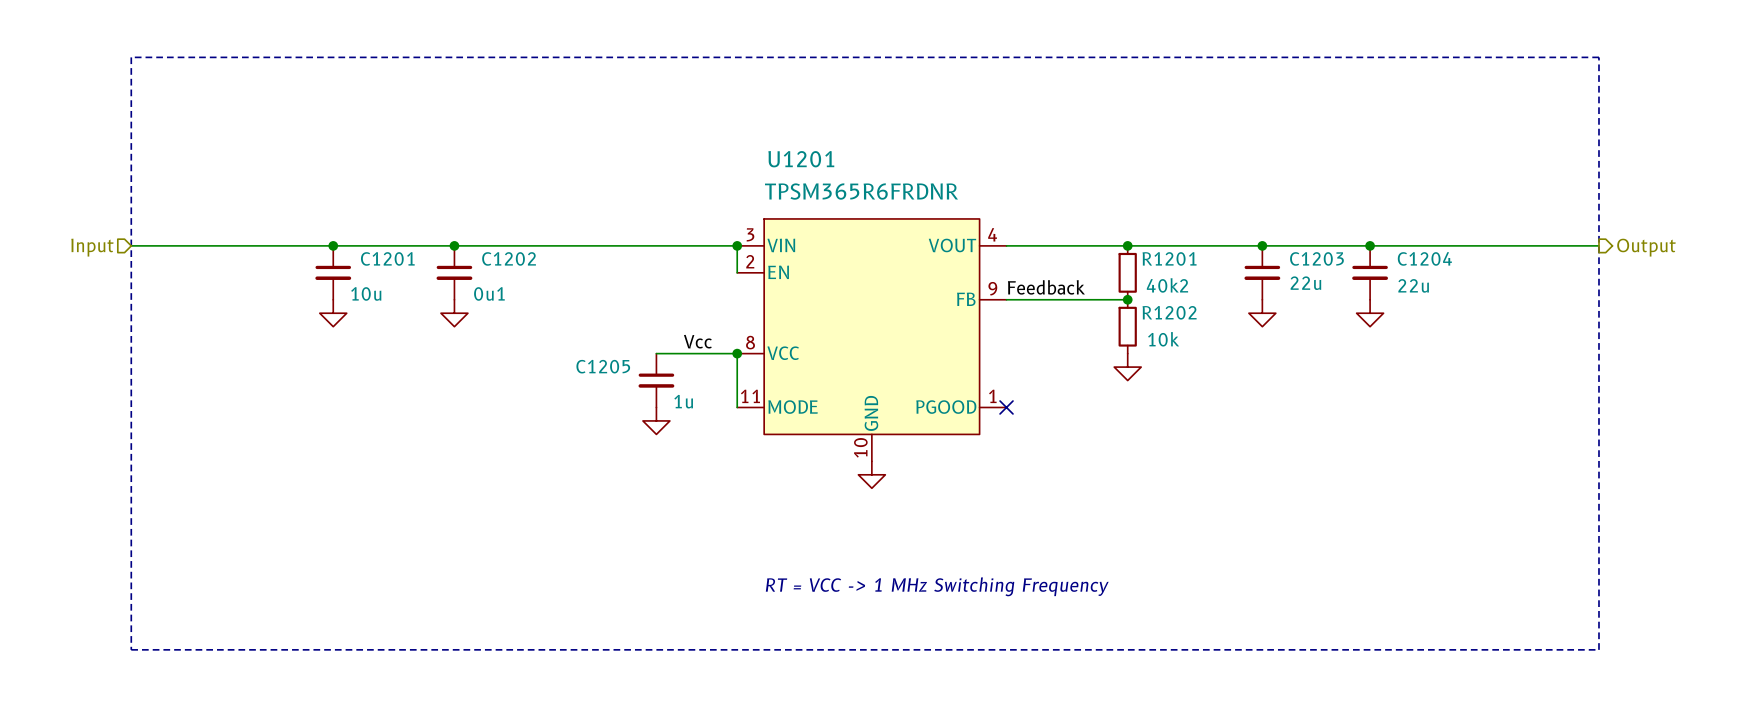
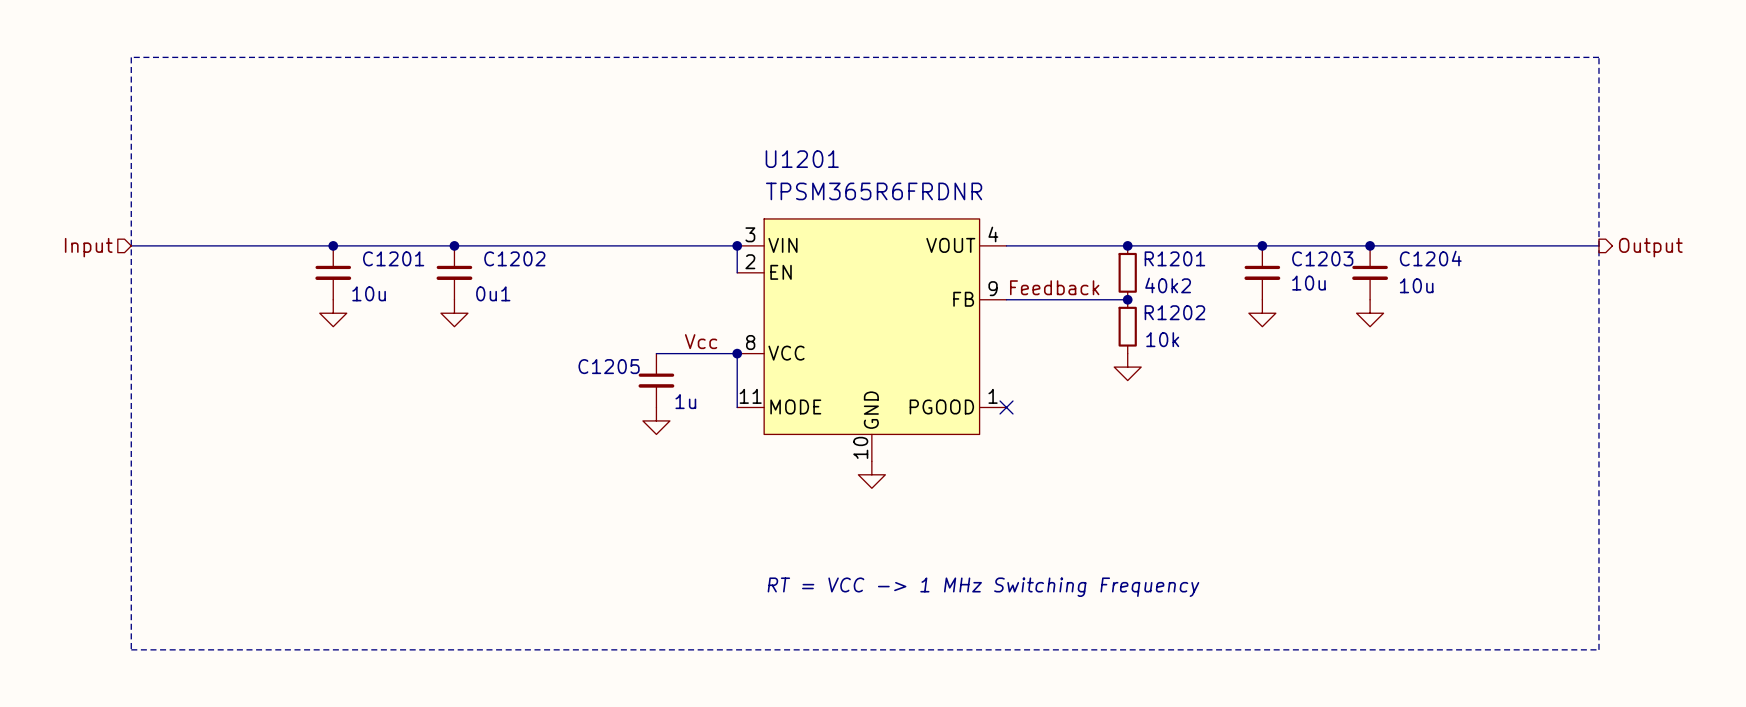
C1203 value: 22u (1305, 283) -> 10u (1308, 283)
C1204 value: 22u (1413, 285) -> 10u (1416, 285)

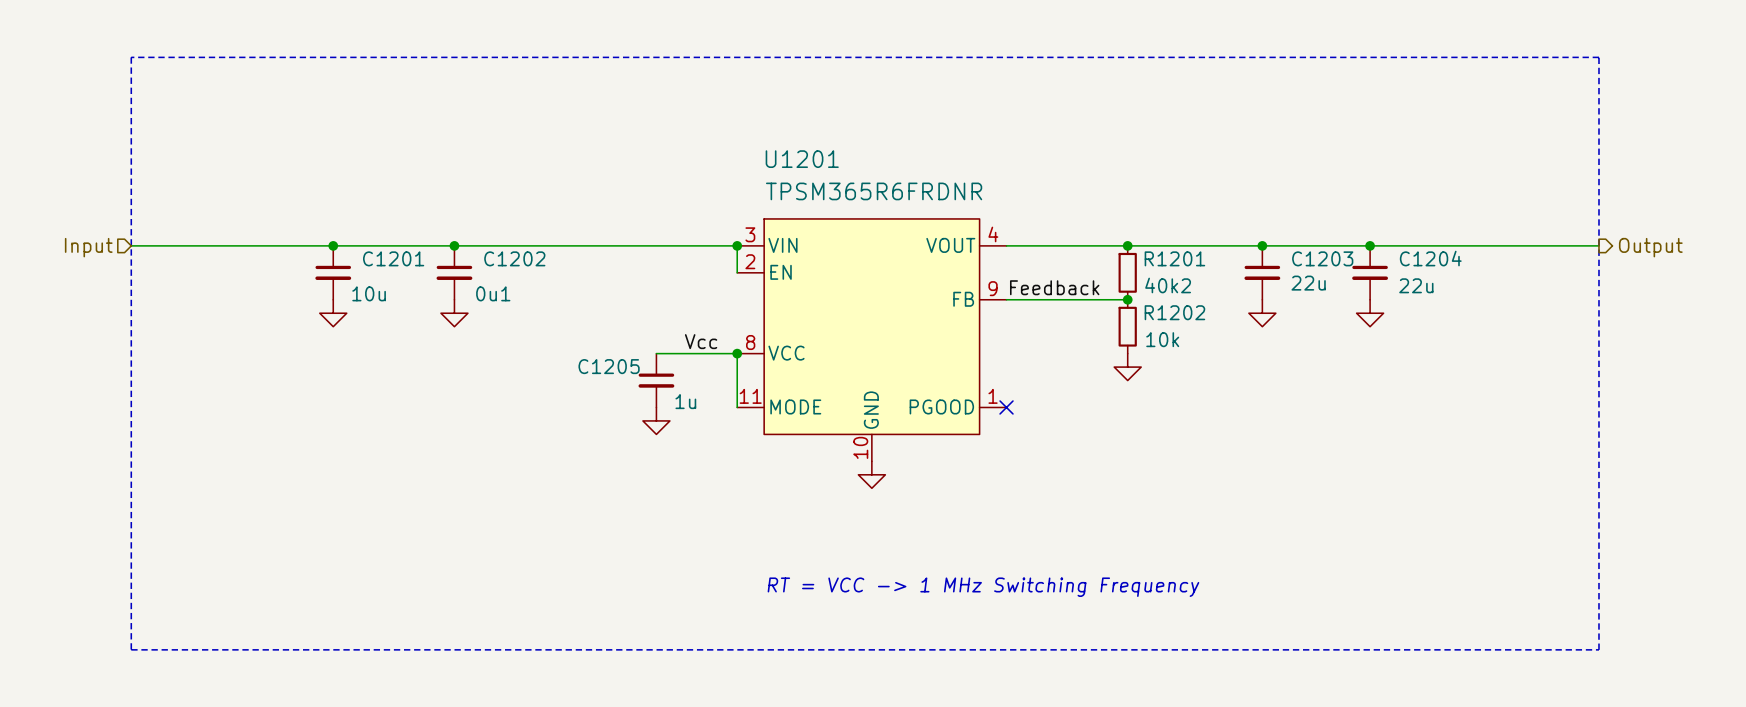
C1203 value: 10u (1308, 283) -> 22u (1308, 283)
C1204 value: 10u (1416, 285) -> 22u (1416, 285)

